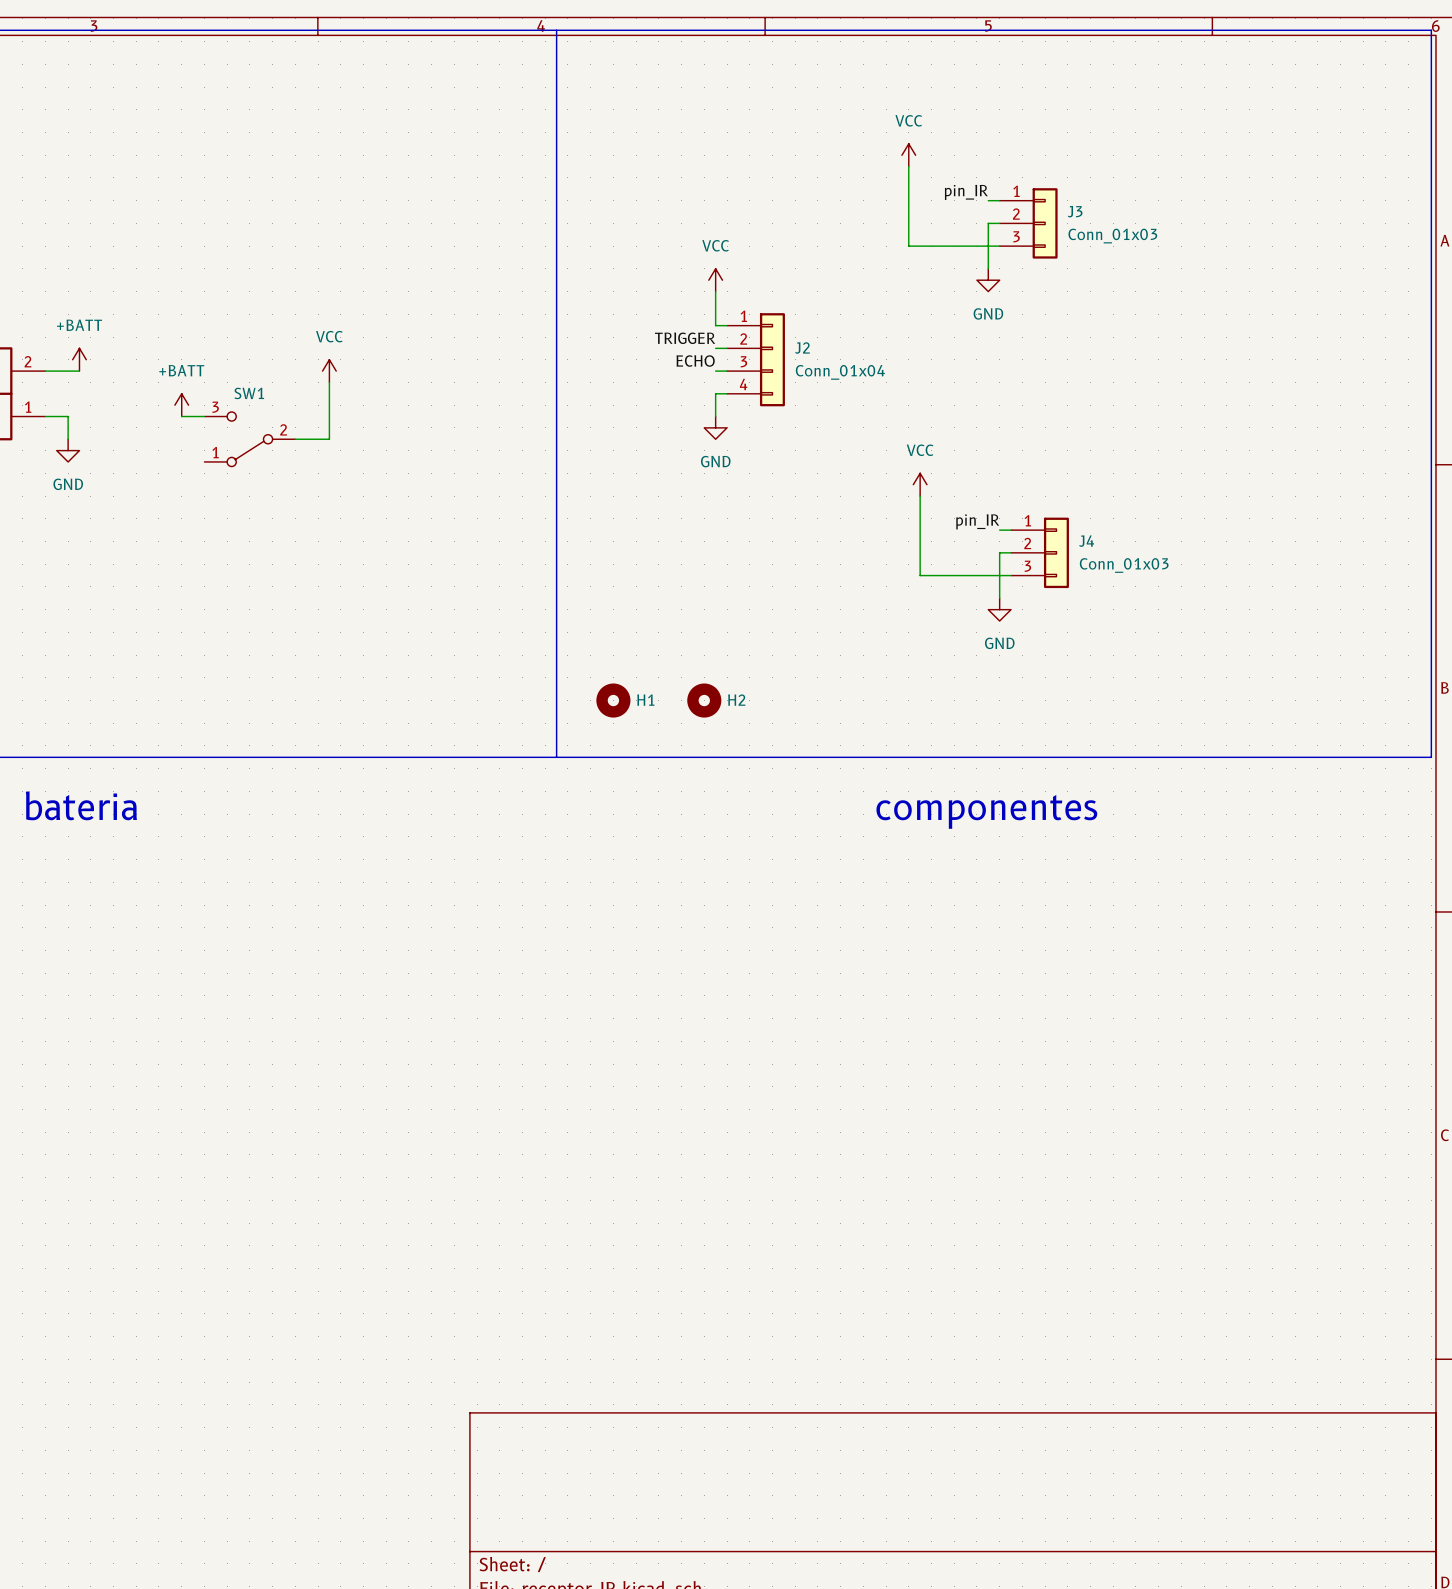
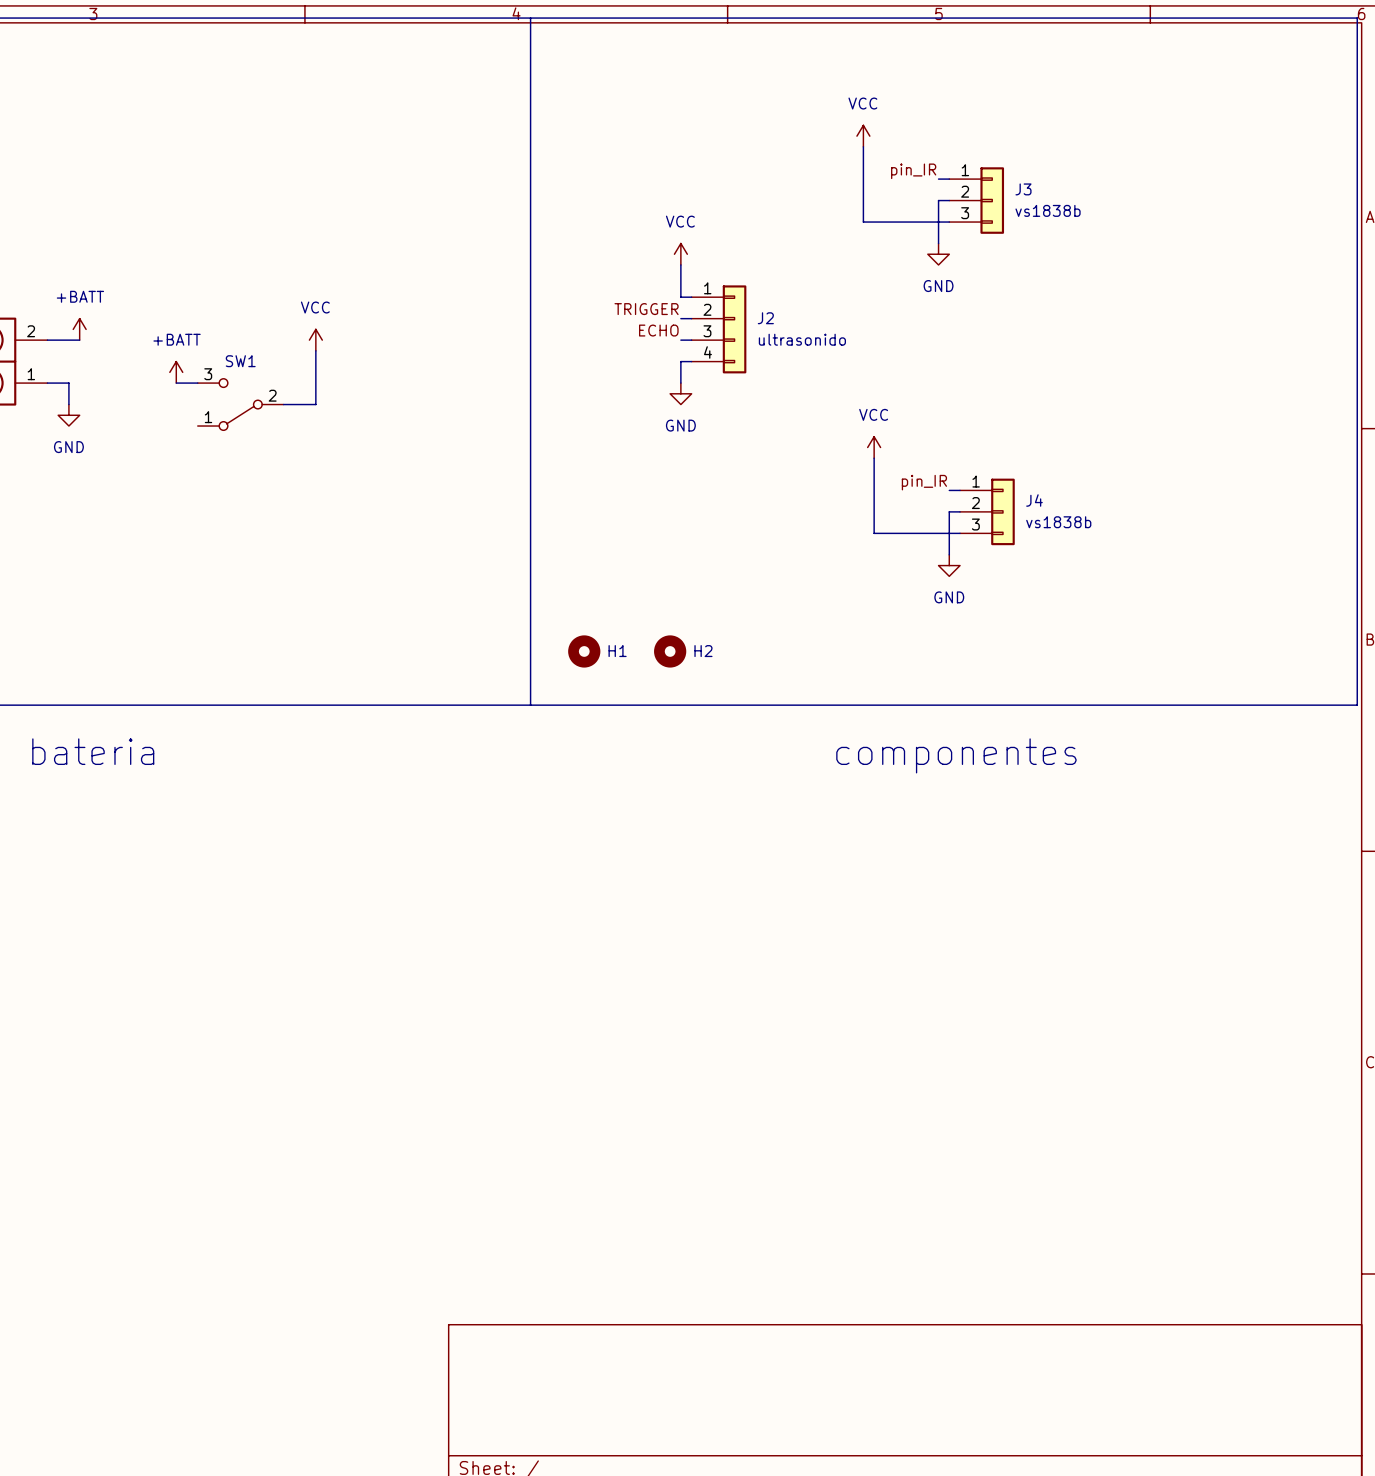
J3 value: Conn_01x03 (1112, 236) -> vs1838b (1048, 210)
J2 value: Conn_01x04 (840, 372) -> ultrasonido (802, 339)
J4 value: Conn_01x03 (1124, 565) -> vs1838b (1058, 522)

